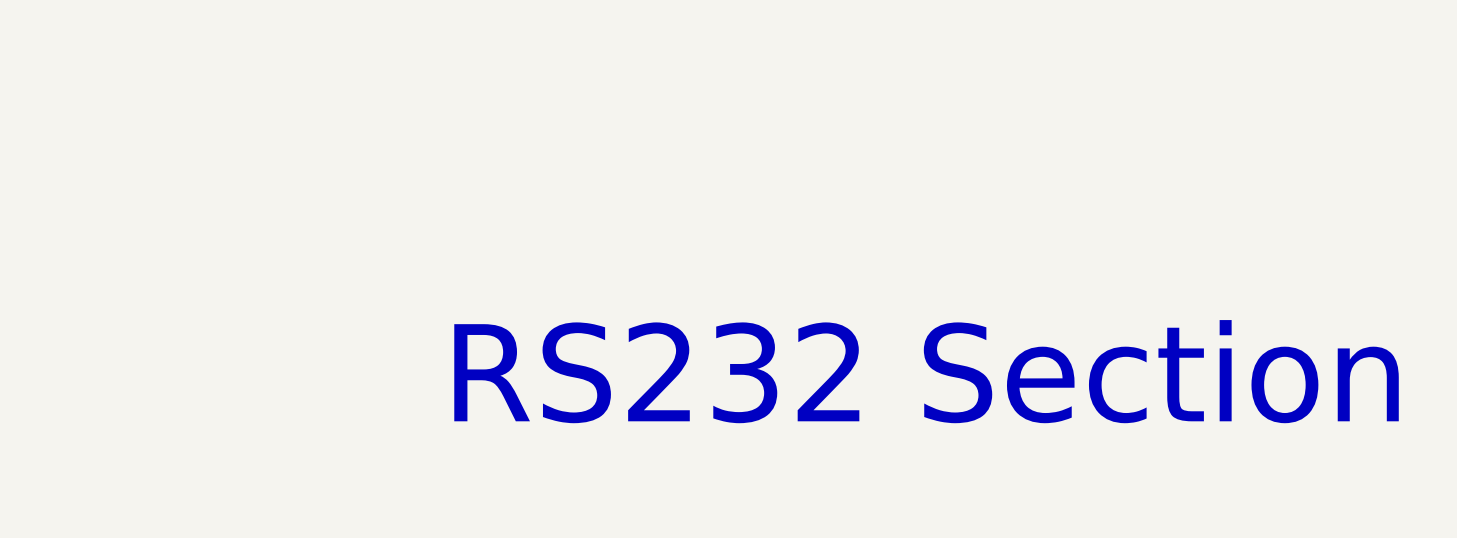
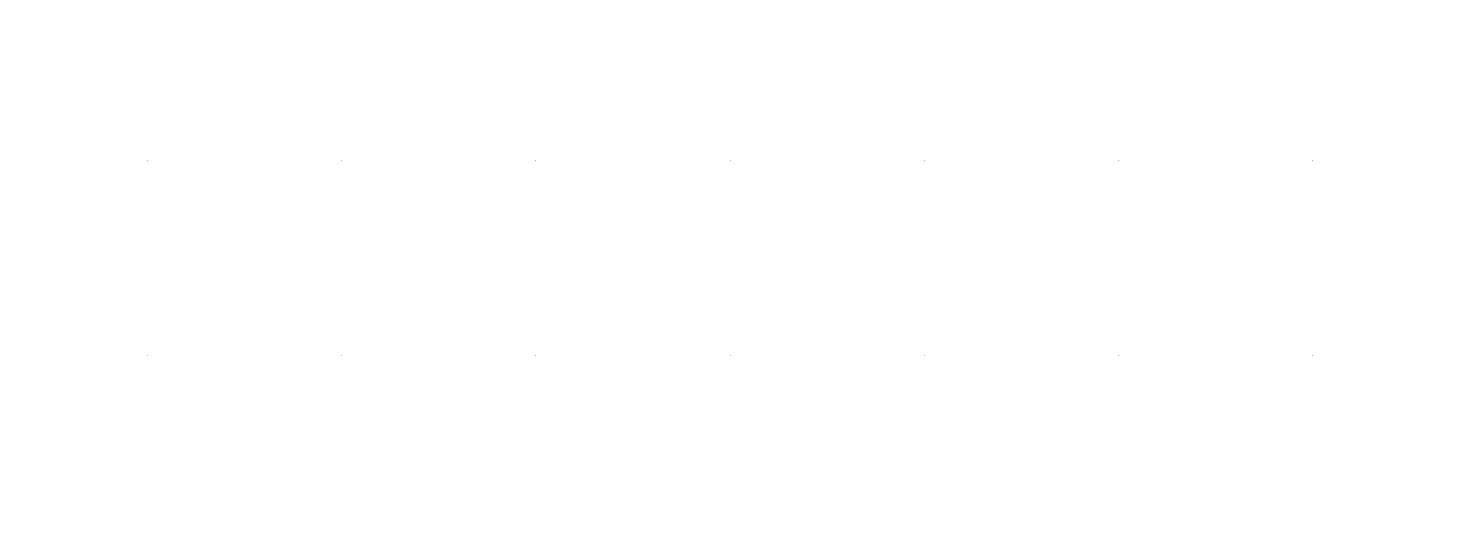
text: RS232 Section (926, 371) -> none

